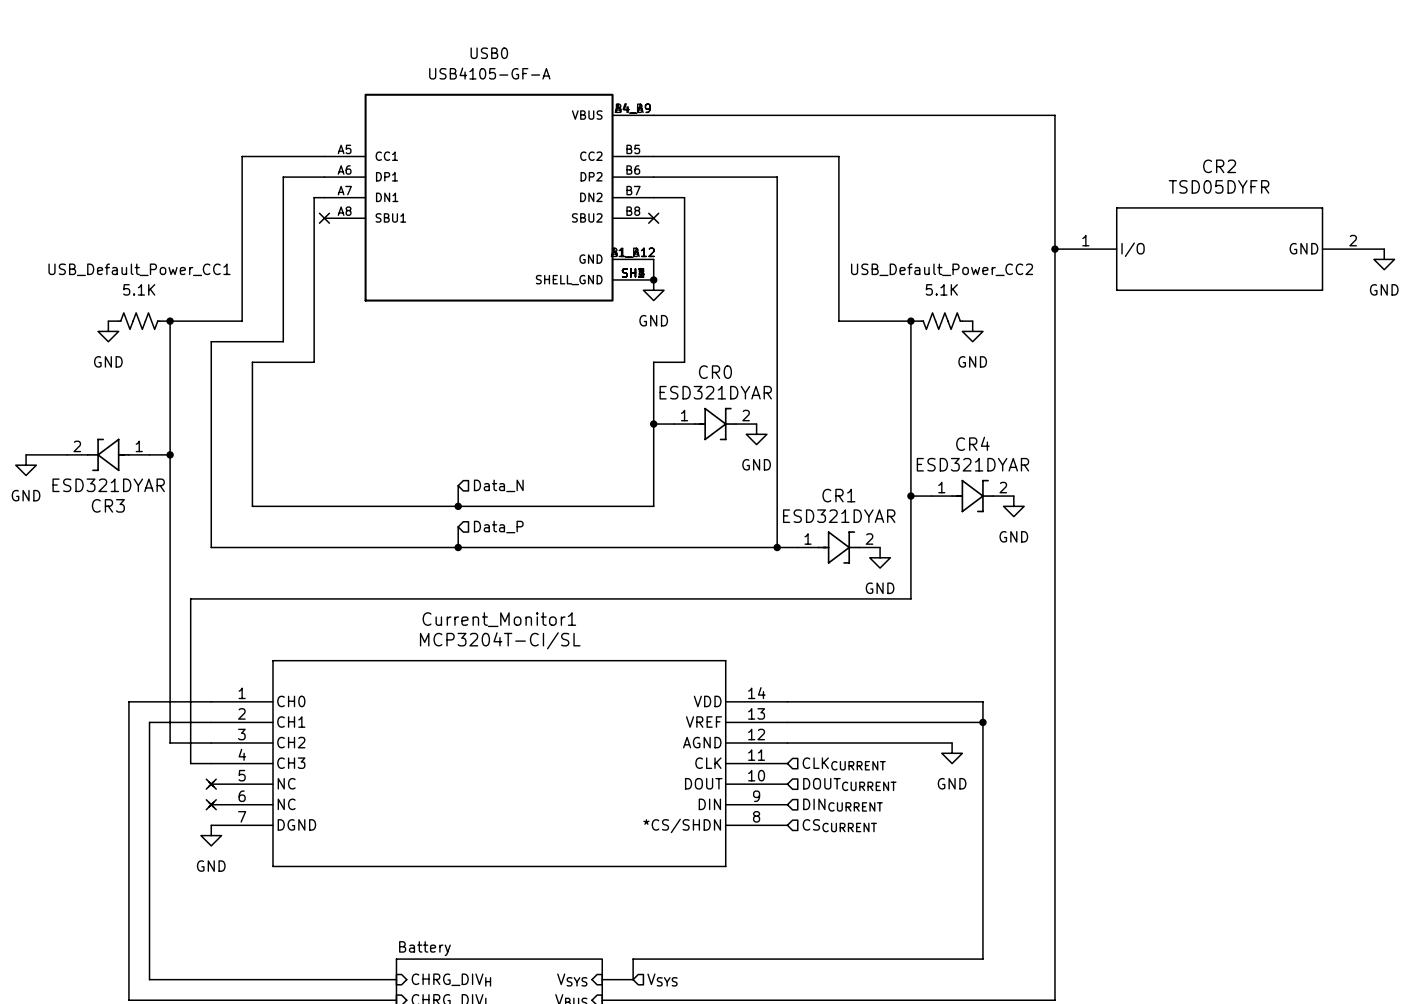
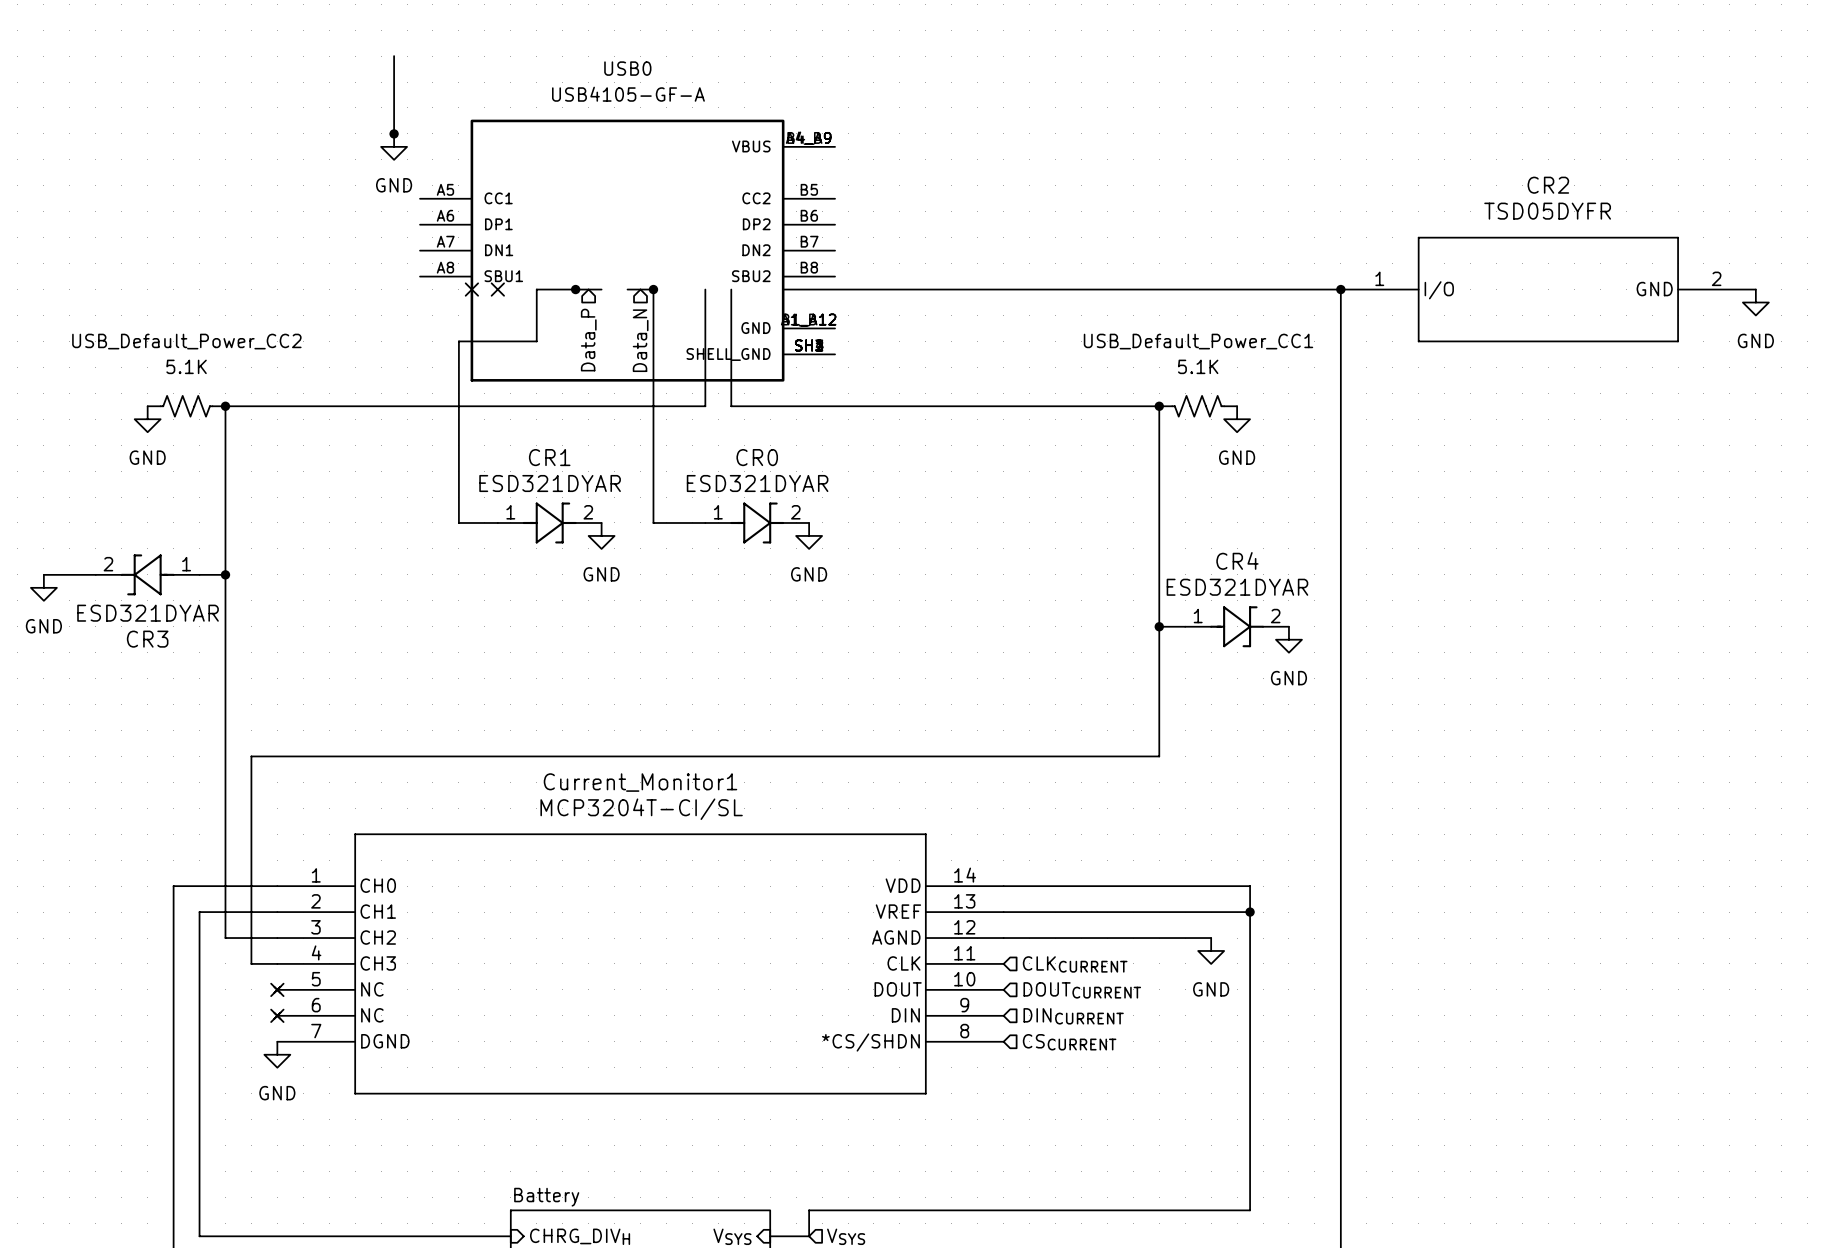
wire: none -> (394, 56) (394, 133)
junction: none -> (394, 133)
power symbol: none -> GND (394, 146)
wire: (653, 115) (1054, 115) (1054, 228) -> (783, 289) (1340, 289)
wire: (324, 156) (242, 156) (242, 321) -> (705, 289) (705, 406) (316, 406)
wire: (653, 156) (838, 156) (838, 321) -> (731, 289) (731, 406) (1068, 406)
wire: (324, 177) (283, 177) (283, 341) (211, 341) (211, 547) (797, 547) -> none
wire: (653, 177) (777, 177) (777, 547) -> none
wire: (324, 197) (314, 197) (314, 362) (252, 362) (252, 506) (653, 506) (653, 362) (684, 362) (684, 197) (653, 197) -> none
no-connect mark: (324, 218) -> none
no-connect mark: (653, 218) -> none
no-connect mark: none -> (471, 289)
no-connect mark: none -> (497, 289)
junction: none -> (575, 289)
wire: none -> (601, 289) (536, 289) (536, 341) (458, 341) (458, 522) (497, 522)
wire: none -> (627, 289) (653, 289) (653, 522) (705, 522)
junction: none -> (653, 289)
junction position: (1054, 249) -> (1340, 289)
CR2 position: (1219, 249) -> (1548, 289)
wire: (653, 259) (653, 279) -> none
power symbol position: GND (1384, 259) -> GND (1755, 302)
hierarchical label: none -> Data_P (588, 340)
USB_Default_Power_CC1 name: USB_Default_Power_CC1 (139, 269) -> USB_Default_Power_CC2 (186, 341)
hierarchical label: none -> Data_N (640, 340)
USB_Default_Power_CC2 name: USB_Default_Power_CC2 (942, 269) -> USB_Default_Power_CC1 (1198, 341)
junction: (653, 279) -> none
power symbol: GND (653, 290) -> none
power symbol: none -> GND (601, 535)
power symbol: none -> GND (809, 535)
wire: (653, 424) (674, 424) -> none
junction: (653, 424) -> none
CR0 position: (715, 424) -> (757, 522)
power symbol: GND (756, 434) -> none
wire: (458, 485) (458, 506) -> none
hierarchical label: Data_N (498, 485) -> none
junction: (458, 506) -> none
wire: (458, 526) (458, 547) -> none
hierarchical label: Data_P (498, 527) -> none
junction: (458, 547) -> none
junction: (777, 547) -> none
CR1 position: (838, 547) -> (549, 522)
power symbol: GND (880, 557) -> none

